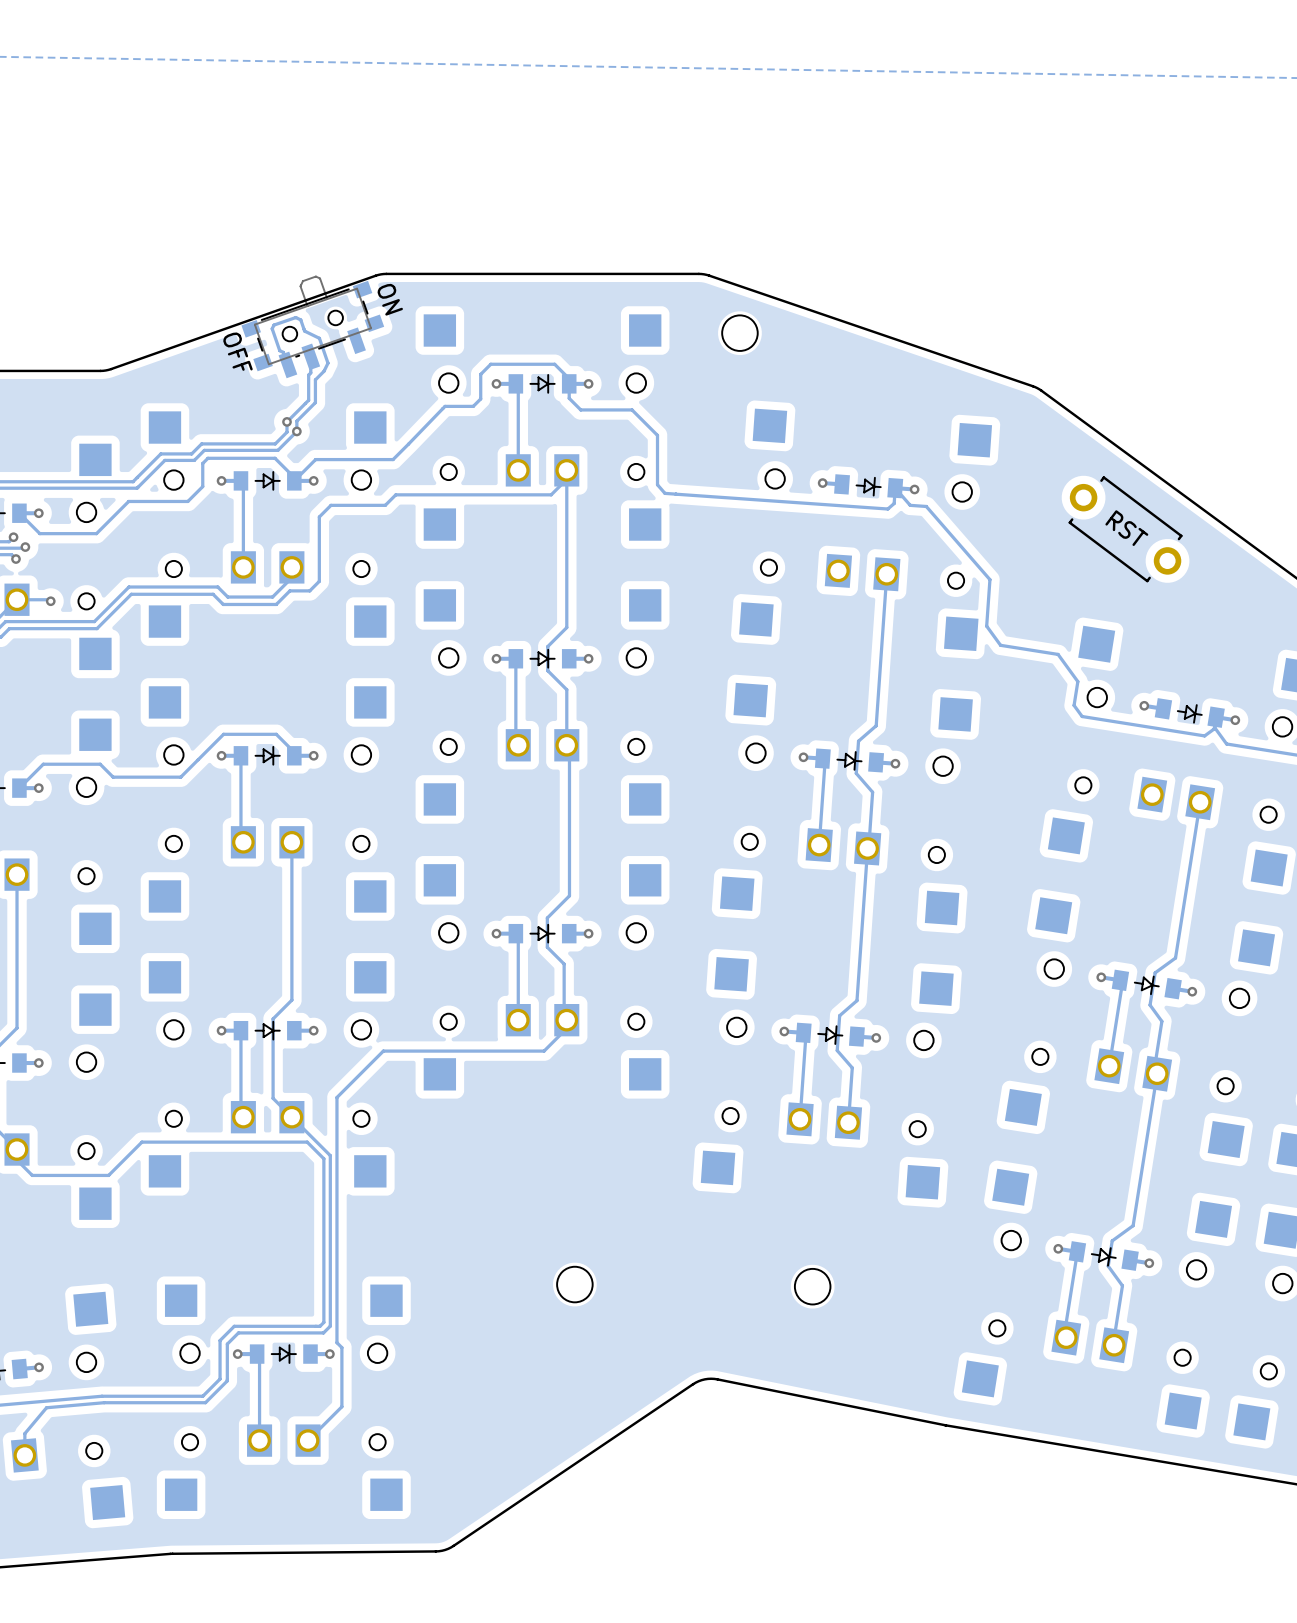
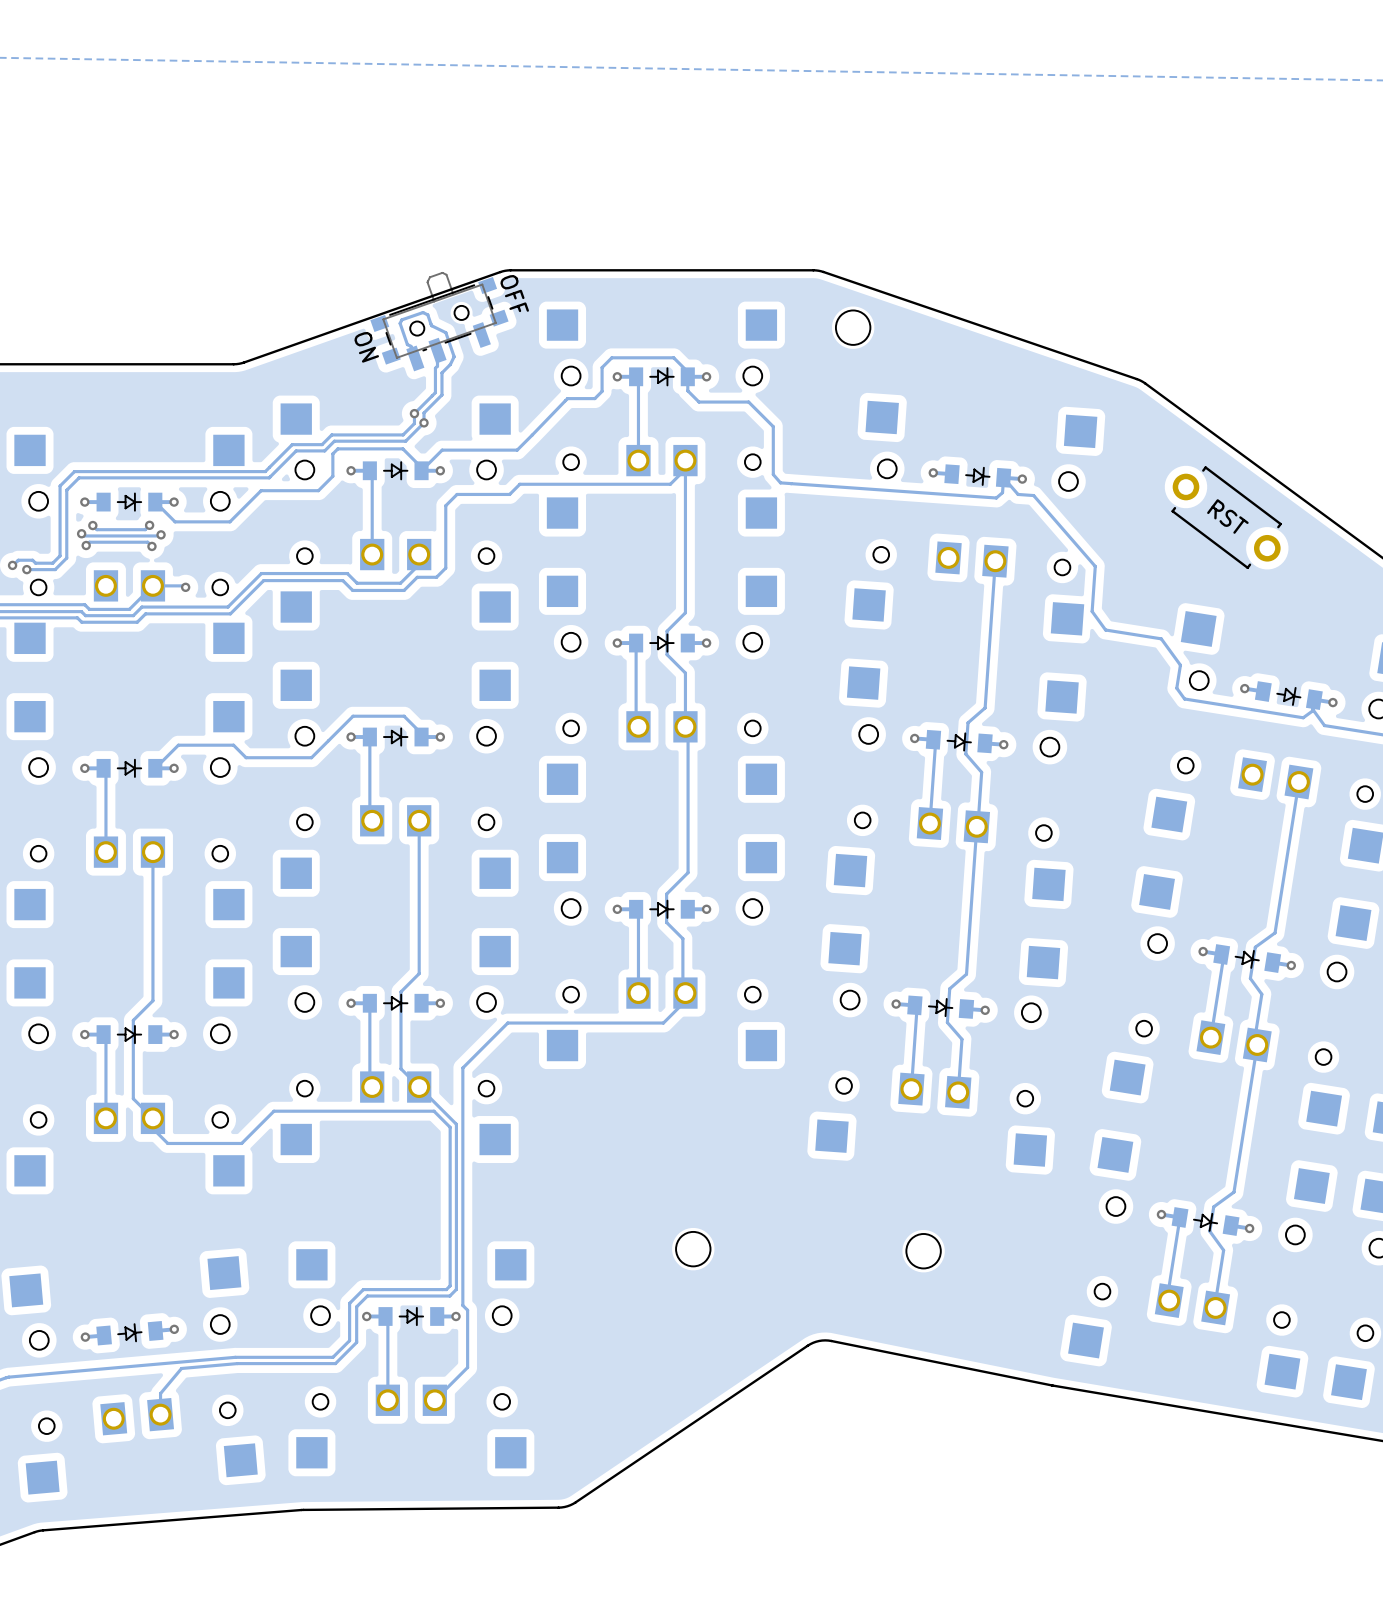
part text: ON (390, 299) -> OFF (514, 293)
part text: OFF (238, 351) -> ON (366, 347)

